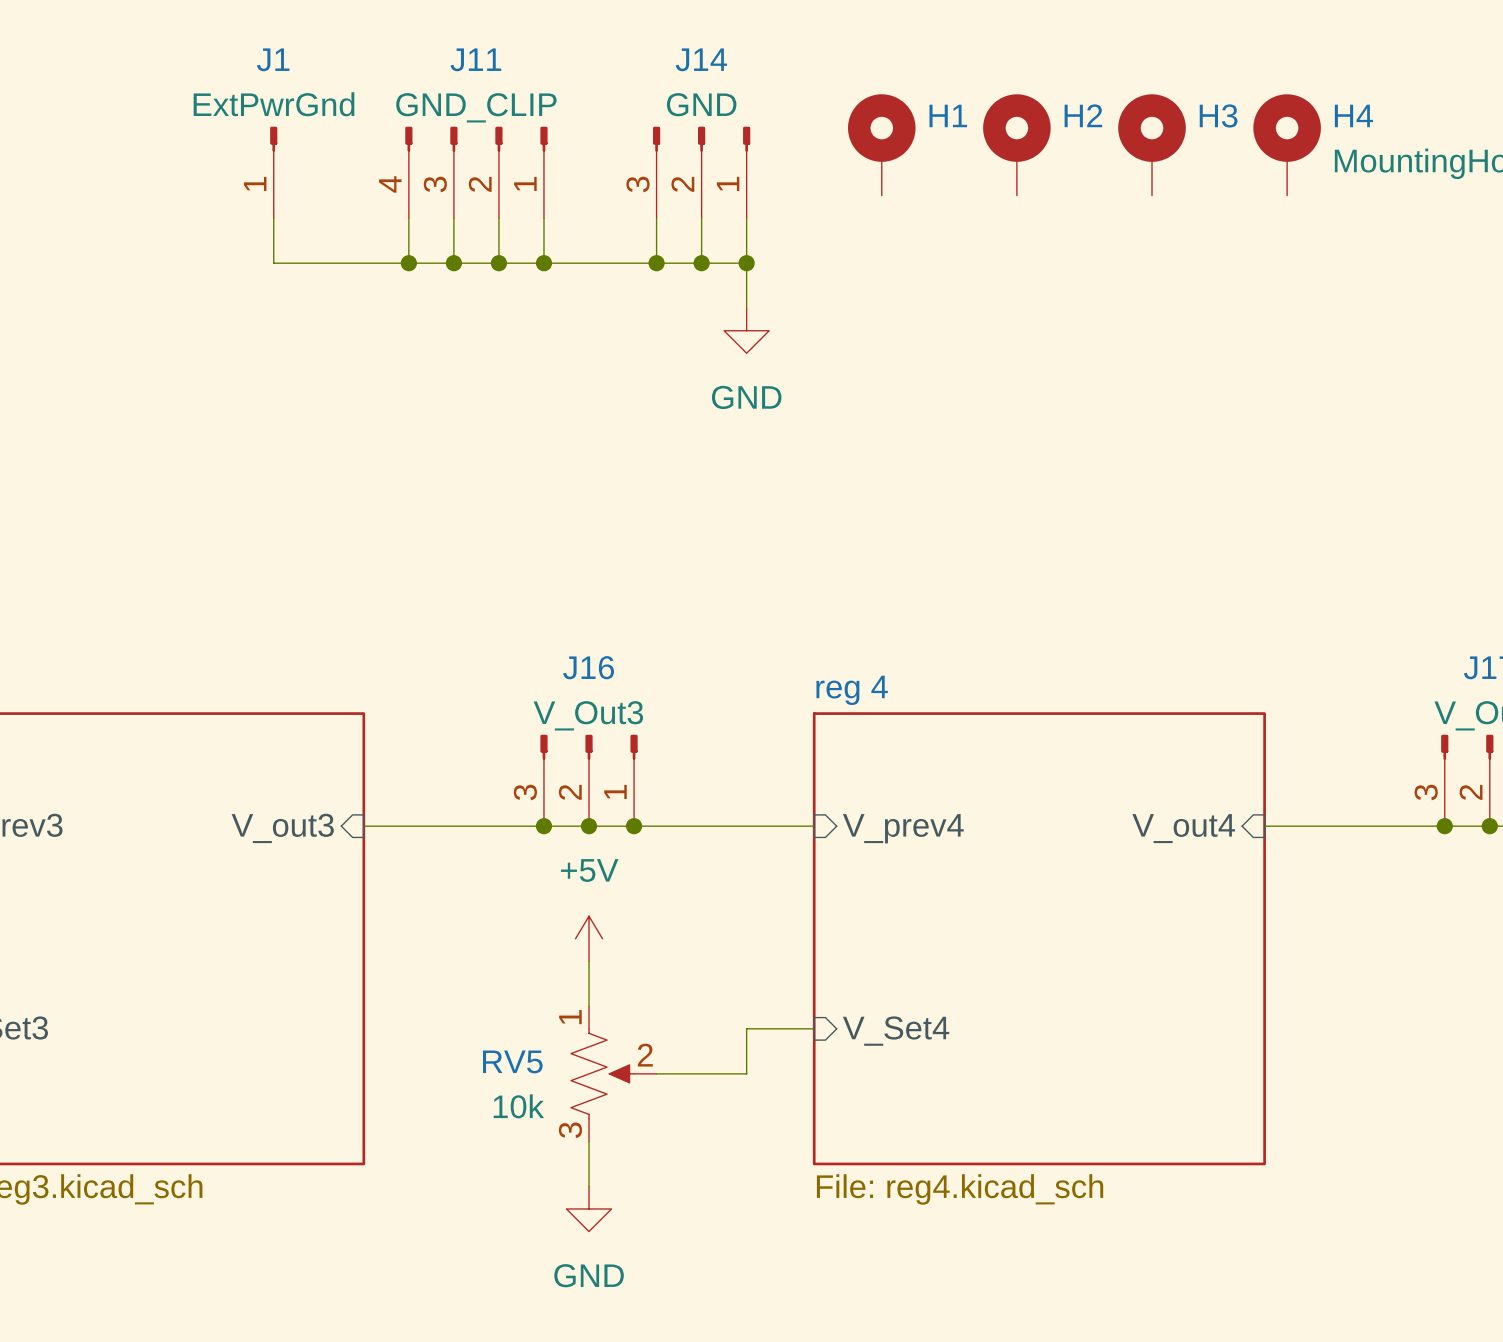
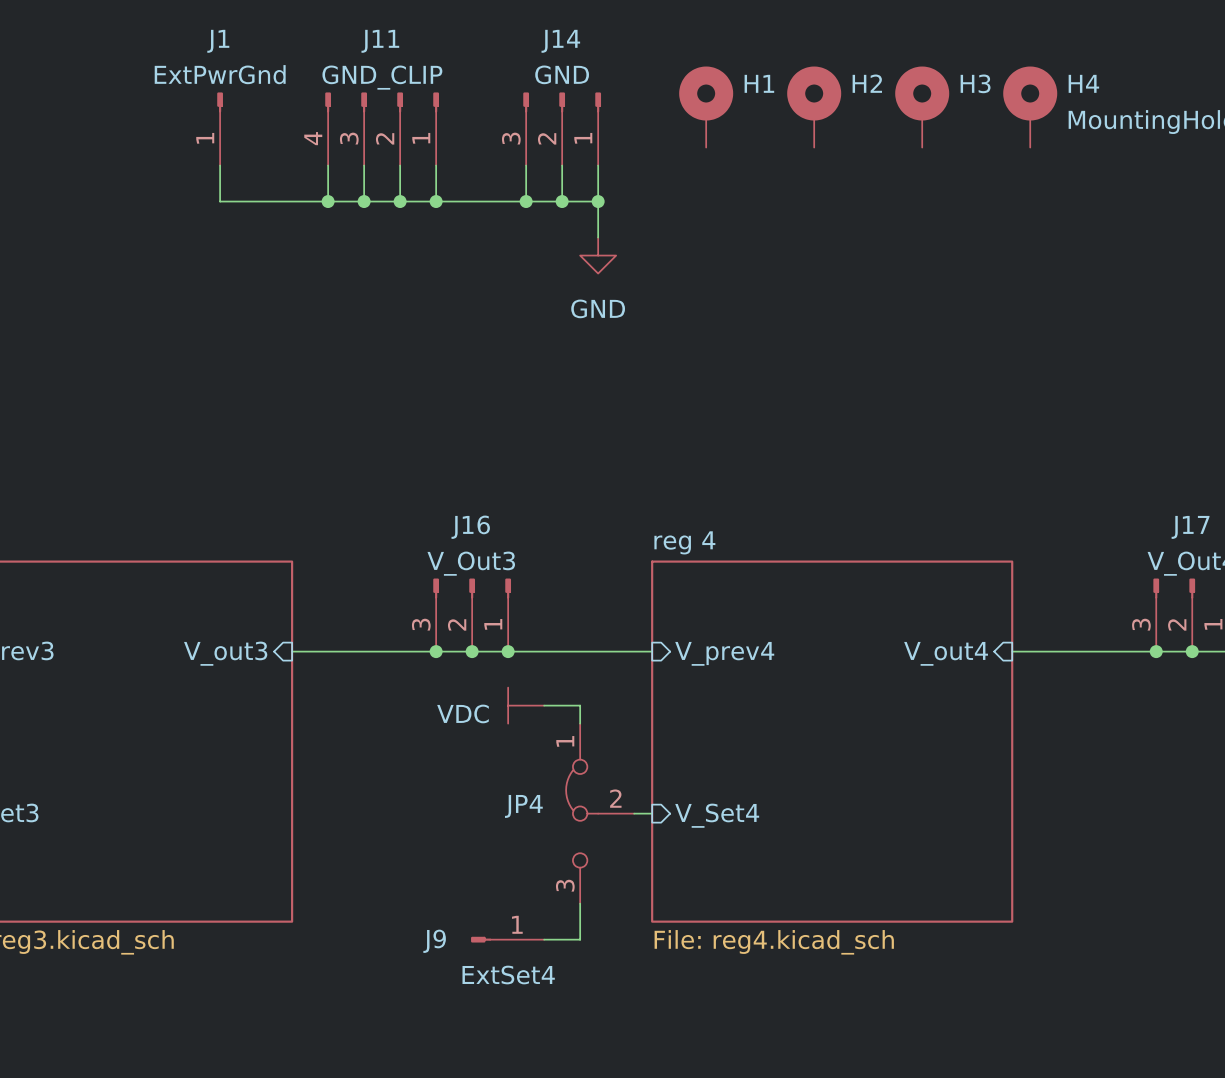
power symbol: none -> VDC (526, 705)
wire: none -> (544, 705) (580, 705) (580, 723)
power symbol: +5V (589, 938) -> none
wire: (589, 961) (589, 1006) -> none
JP4: none -> (600, 813)
wire: (791, 1028) (746, 1028) (746, 1073) (656, 1073) -> none
RV5: 10k (613, 1073) -> none
wire: (589, 1141) (589, 1186) -> none
wire: none -> (580, 903) (580, 939) (544, 939)
J9: none -> ExtSet4 (507, 939)
power symbol: GND (589, 1209) -> none

